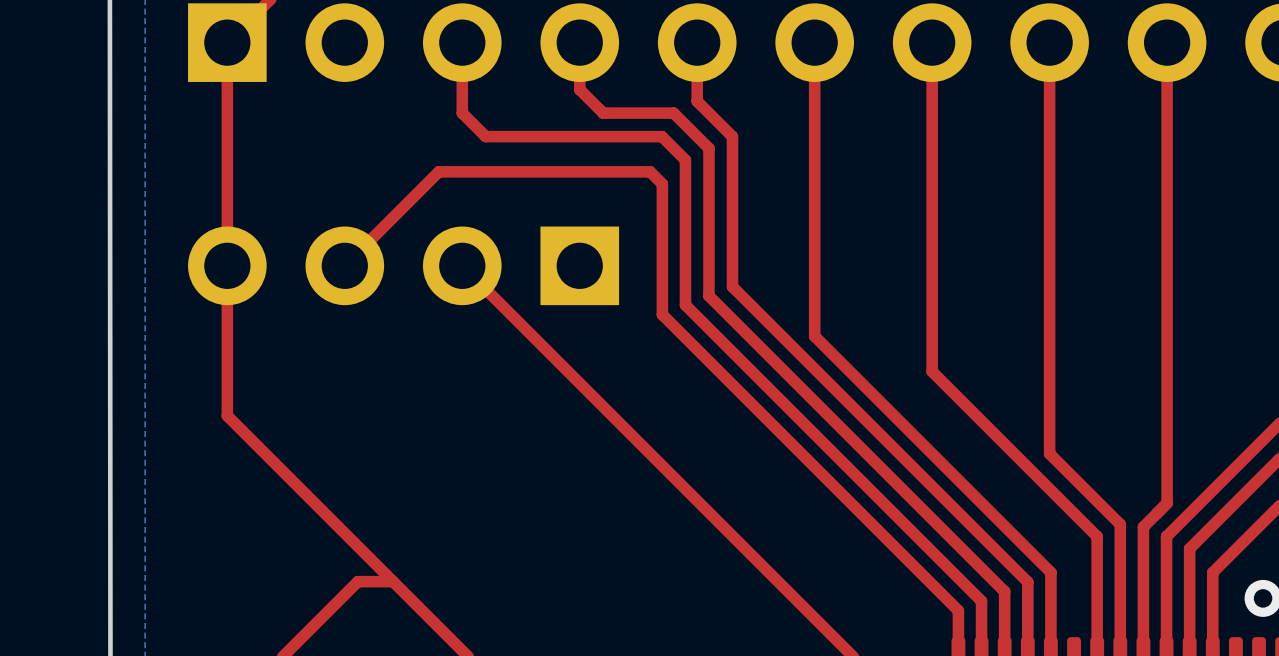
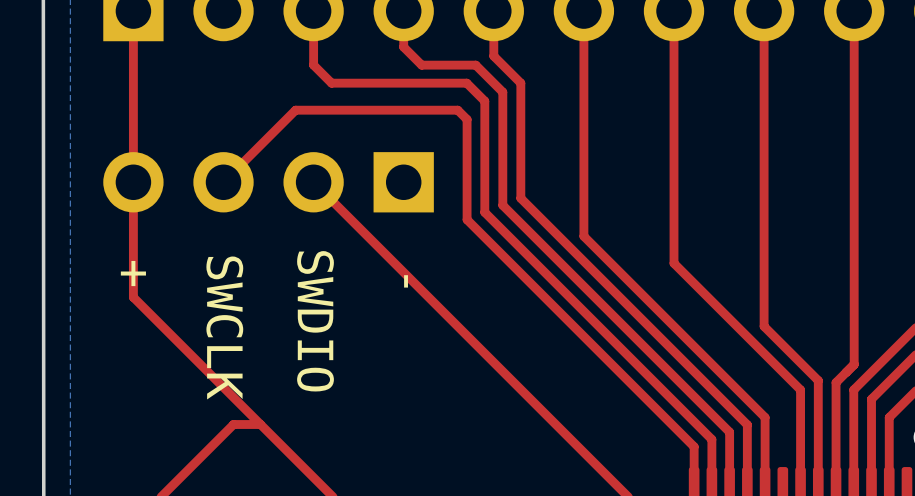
text: none -> + (133, 273)
text: none -> - (406, 281)
text: none -> SWDIO (315, 321)
text: none -> SWCLK (224, 327)

